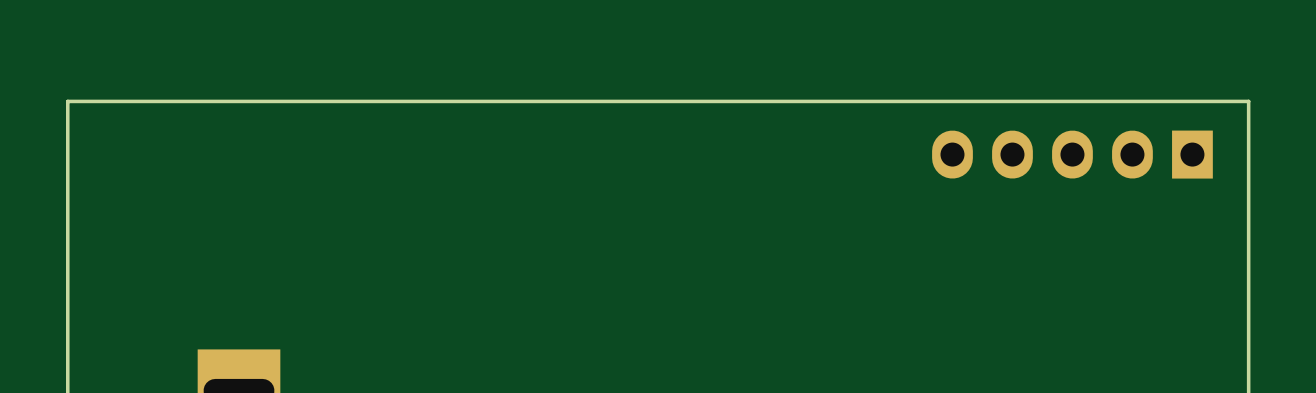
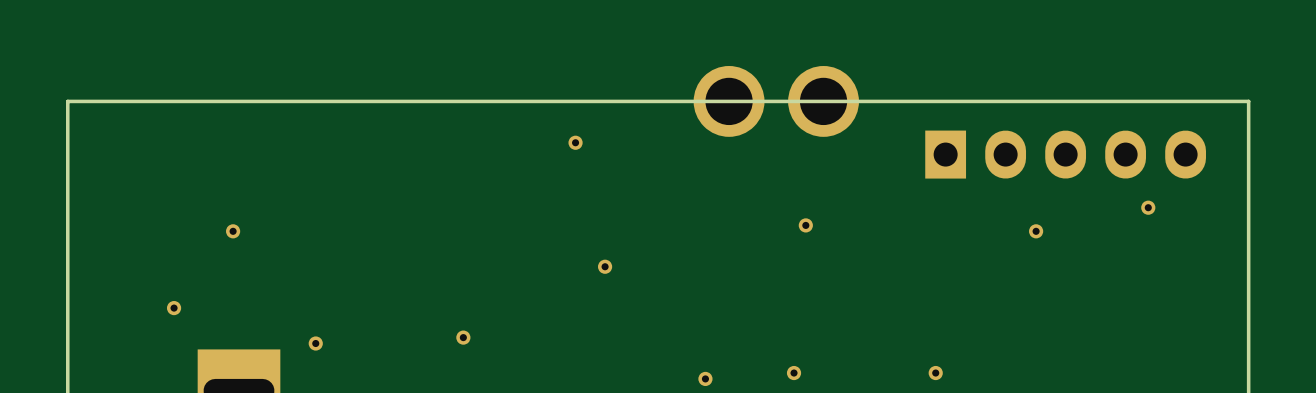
part: none -> (729, 101)
part: none -> (823, 101)
part: none -> (575, 142)
part rotation: 0° (1072, 154) -> 180° (1065, 154)
part: none -> (1148, 207)
part: none -> (805, 225)
part: none -> (233, 231)
part: none -> (1036, 231)
part: none -> (605, 266)
part: none -> (174, 308)
part: none -> (463, 337)
part: none -> (315, 343)
part: none -> (794, 373)
part: none -> (935, 373)
part: none -> (705, 378)

